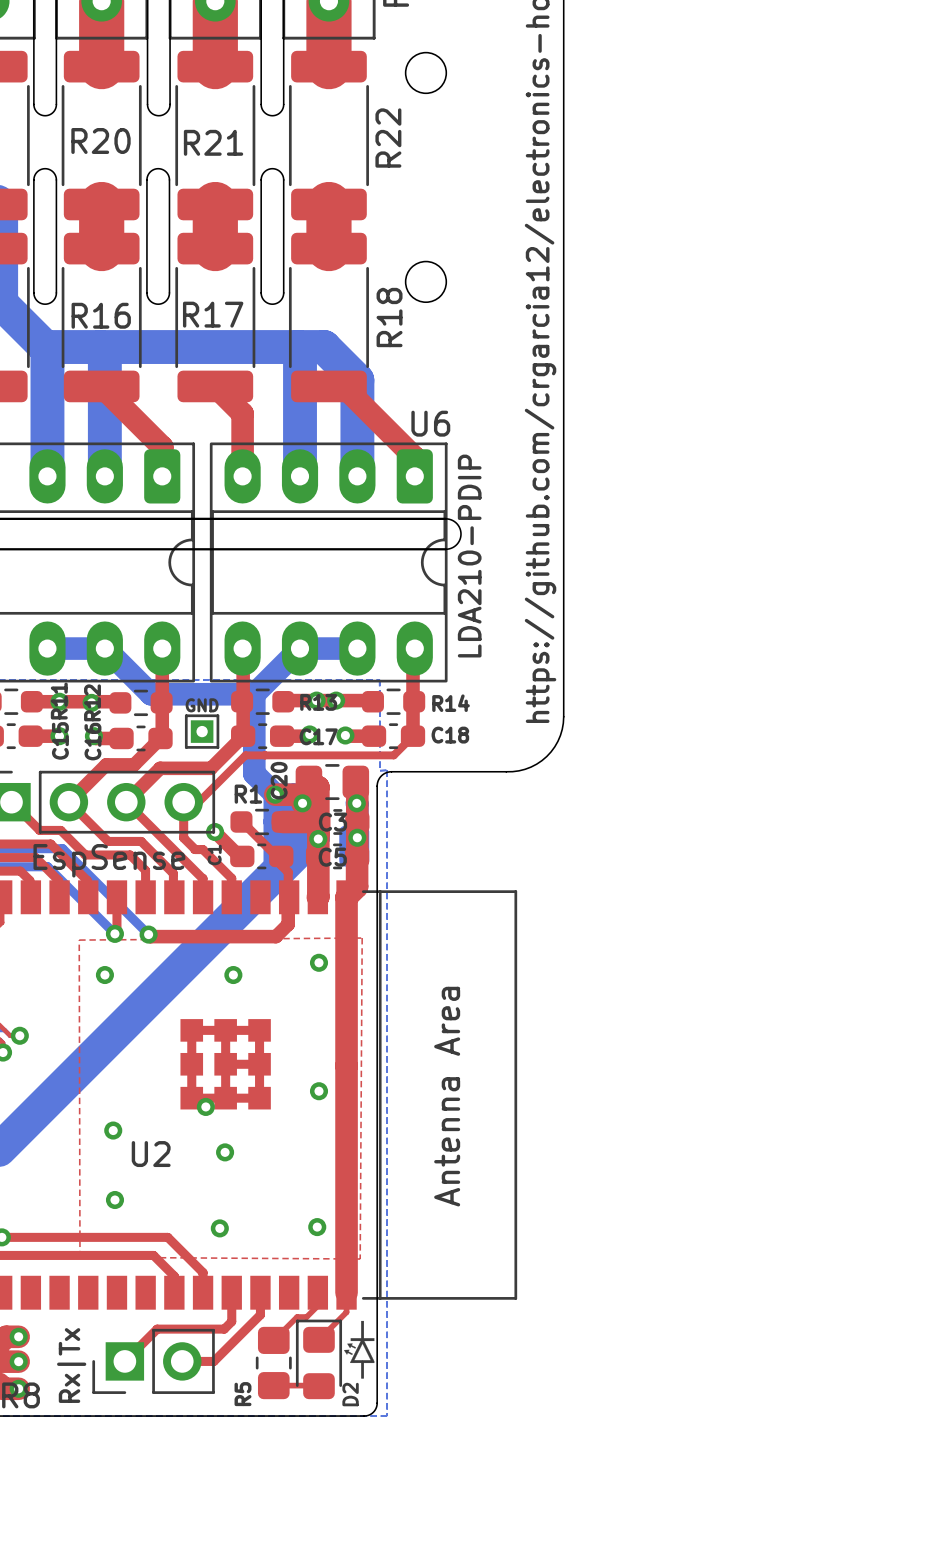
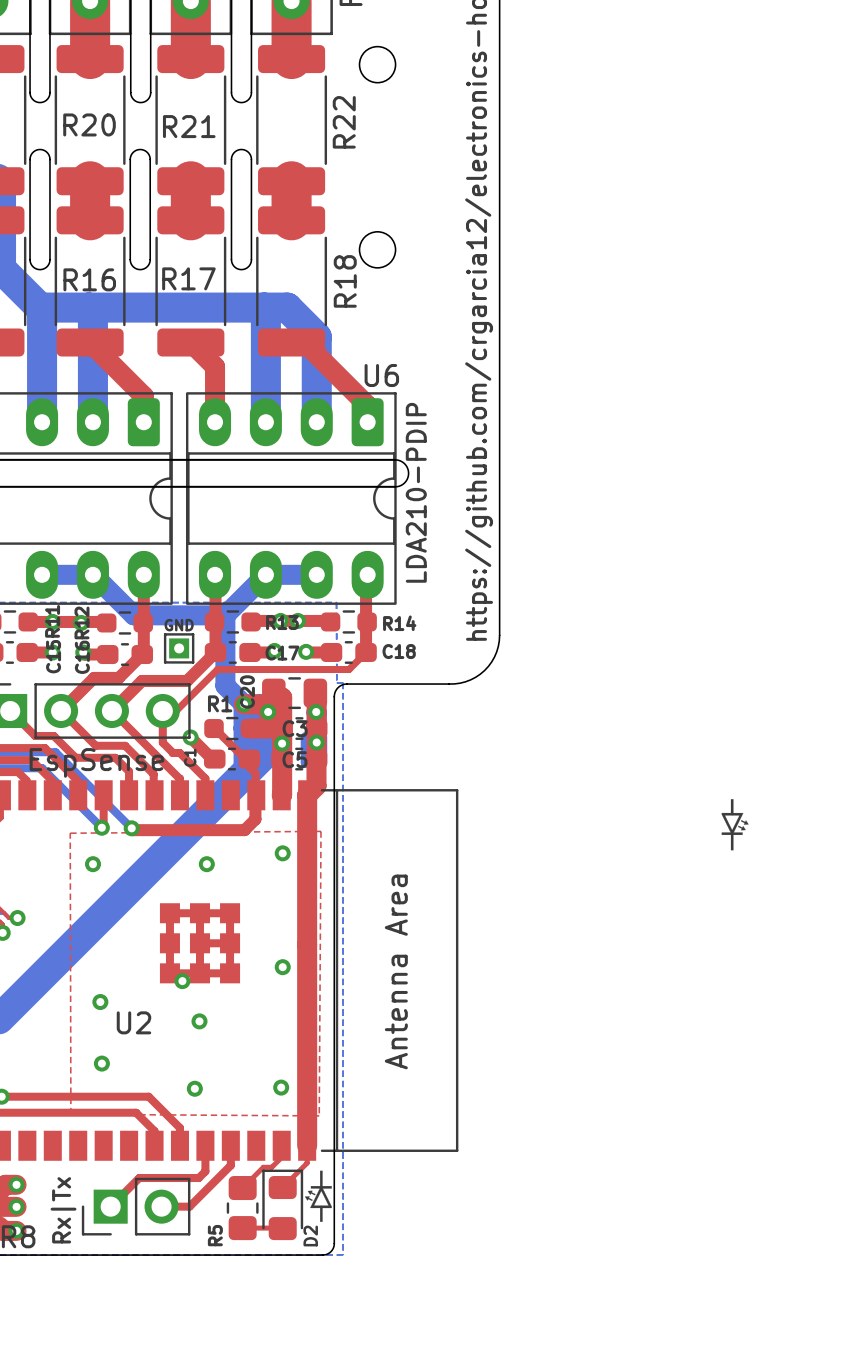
drawing: none -> [721, 799, 749, 851]

